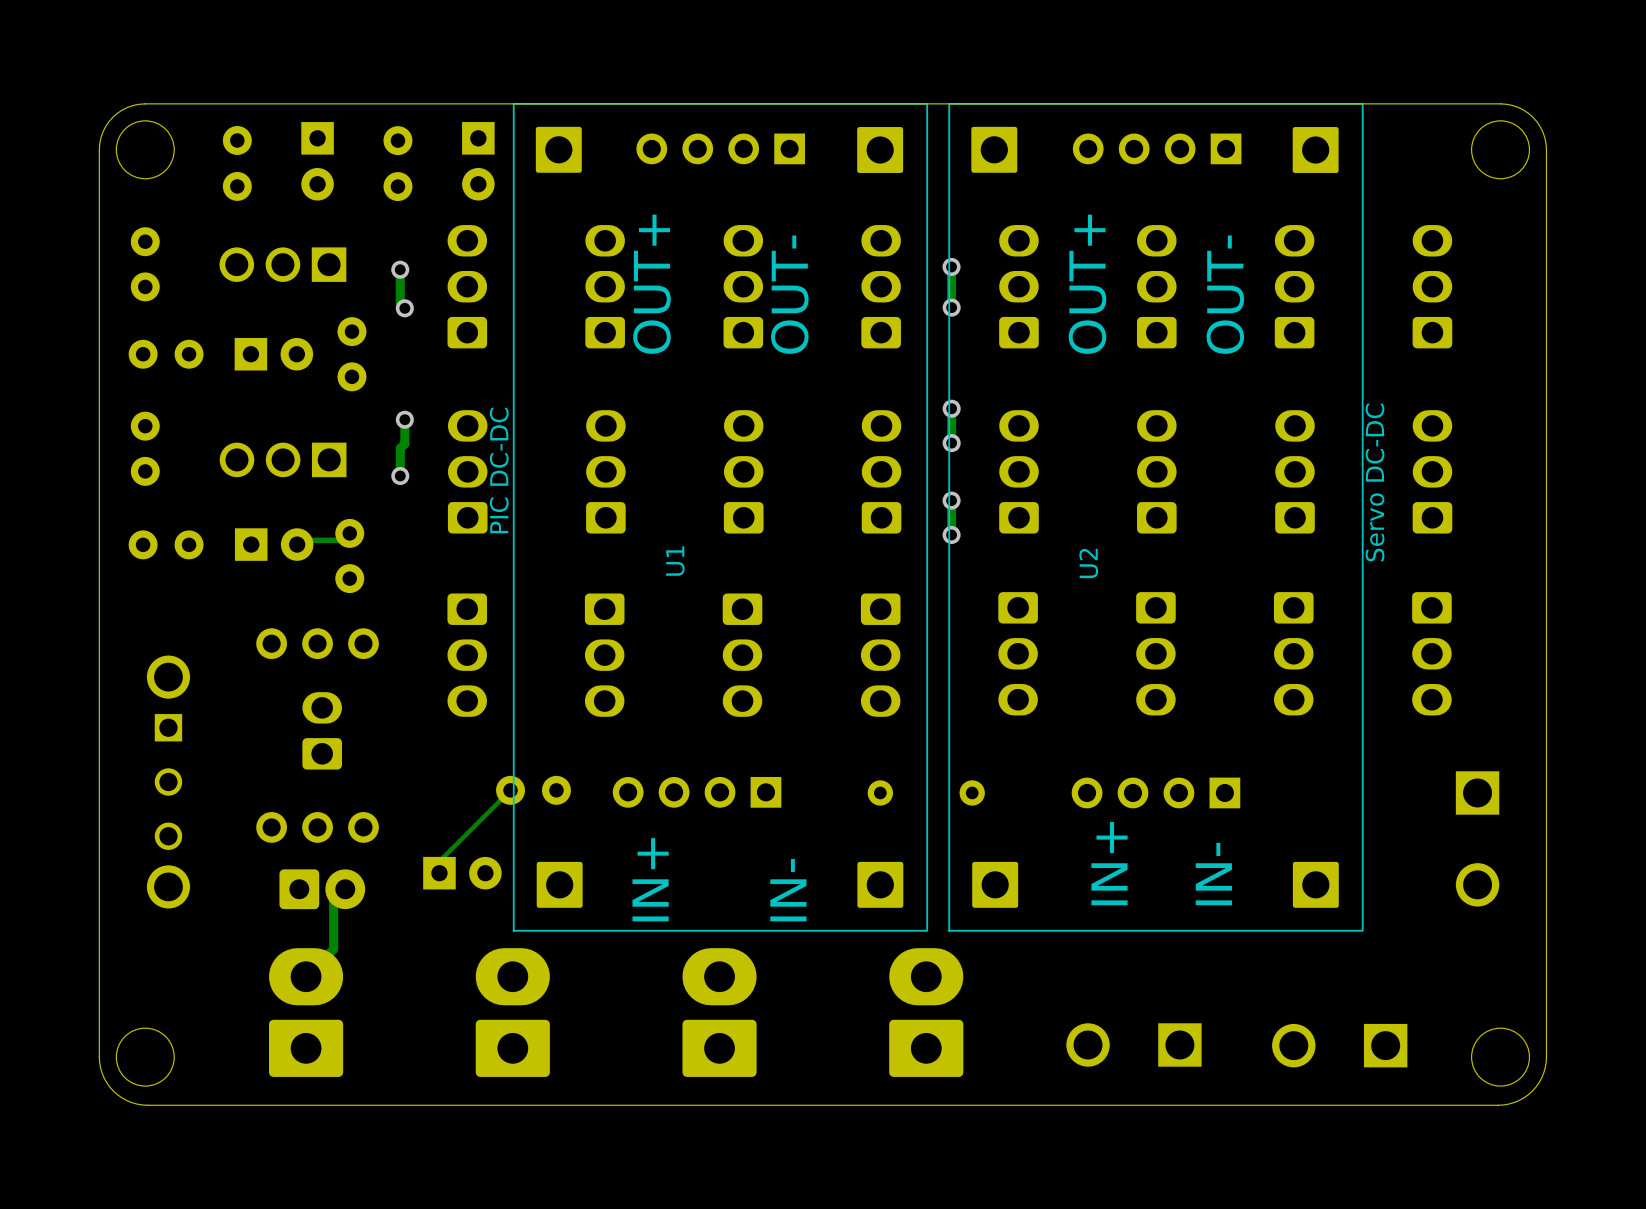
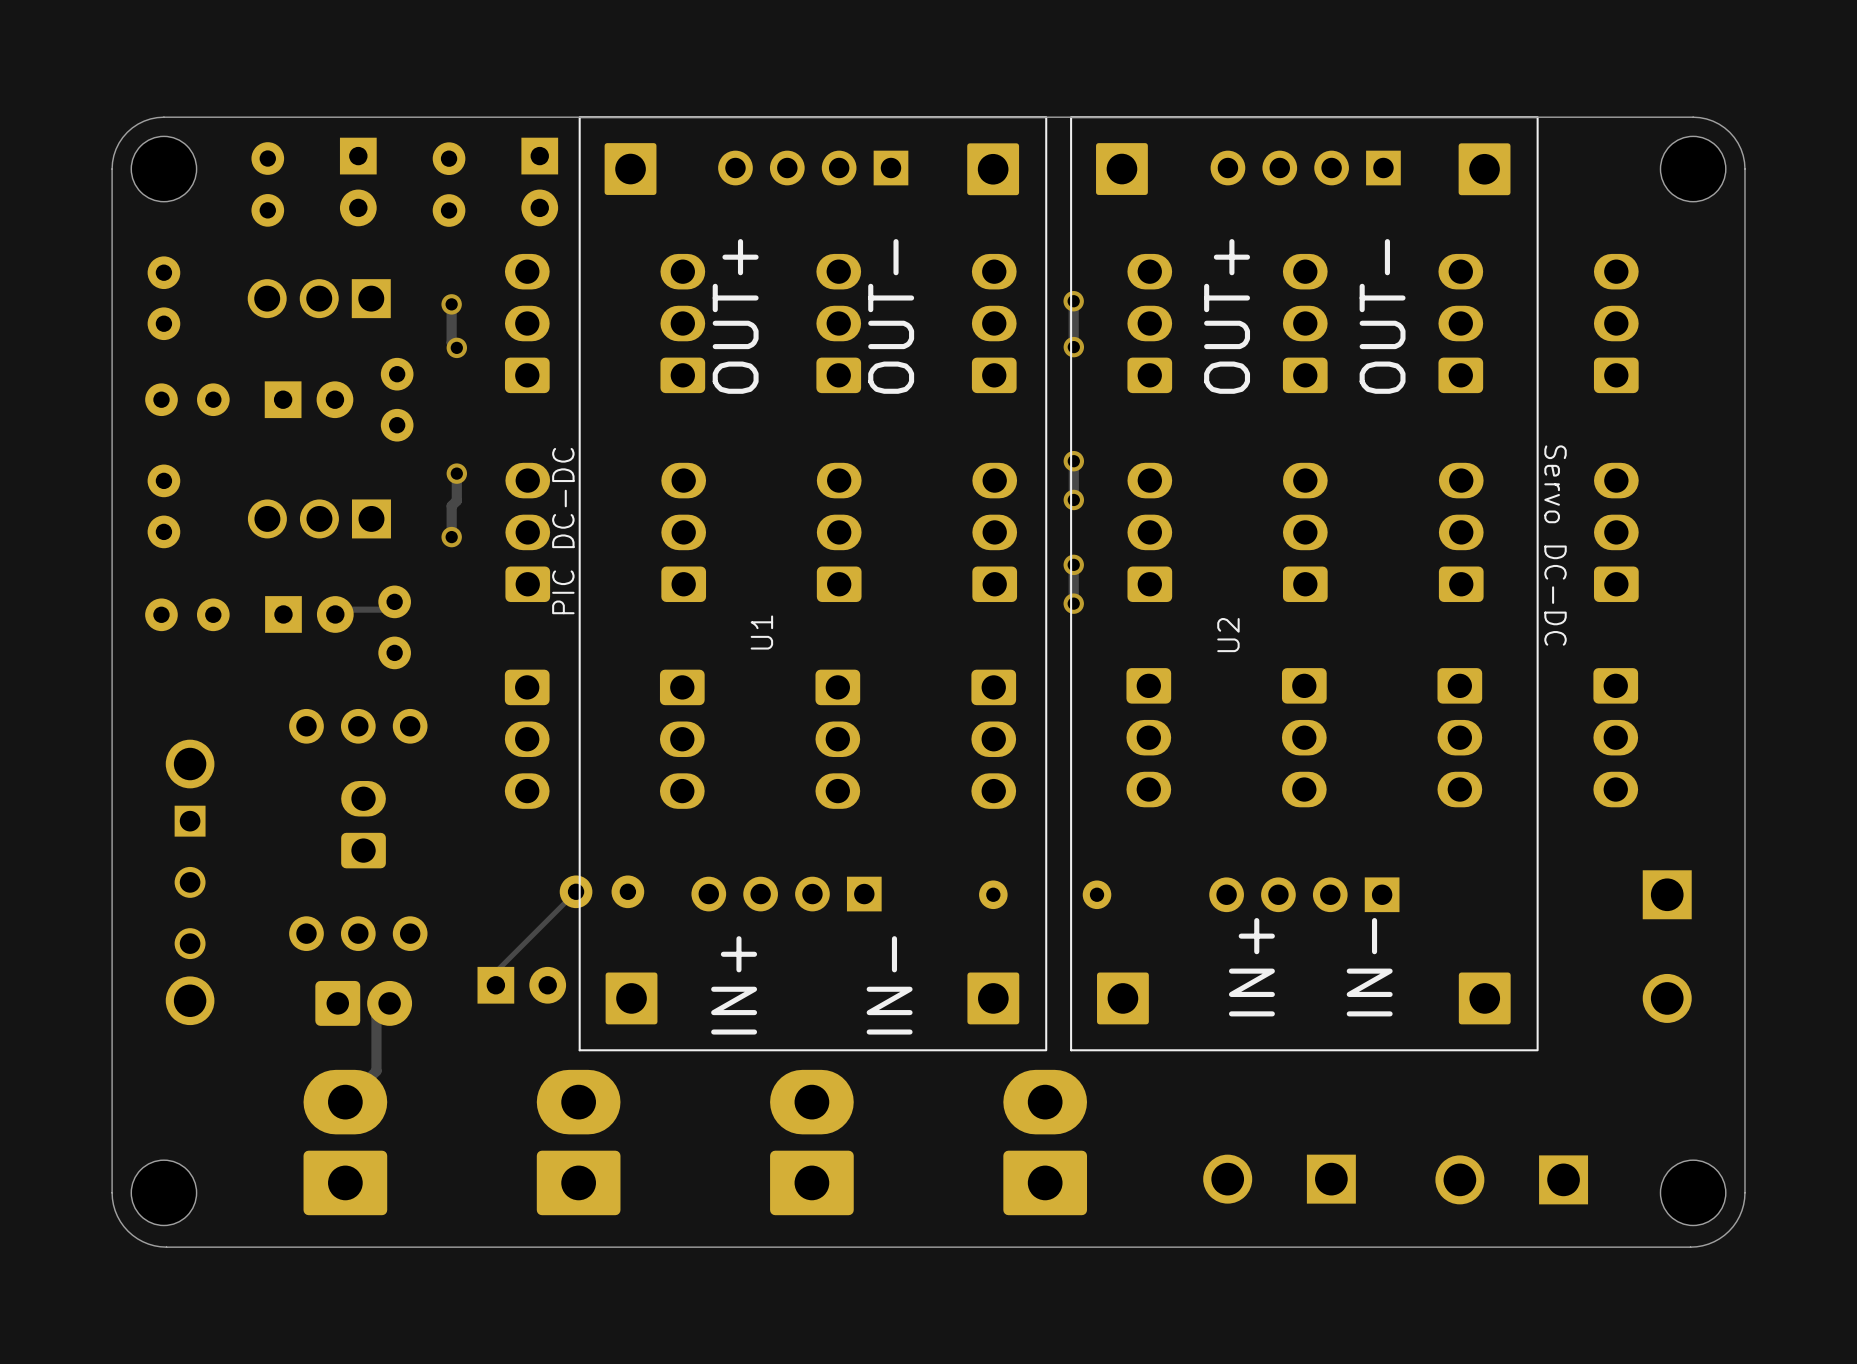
text rotation: 0° (1375, 482) -> 180° (1555, 545)

